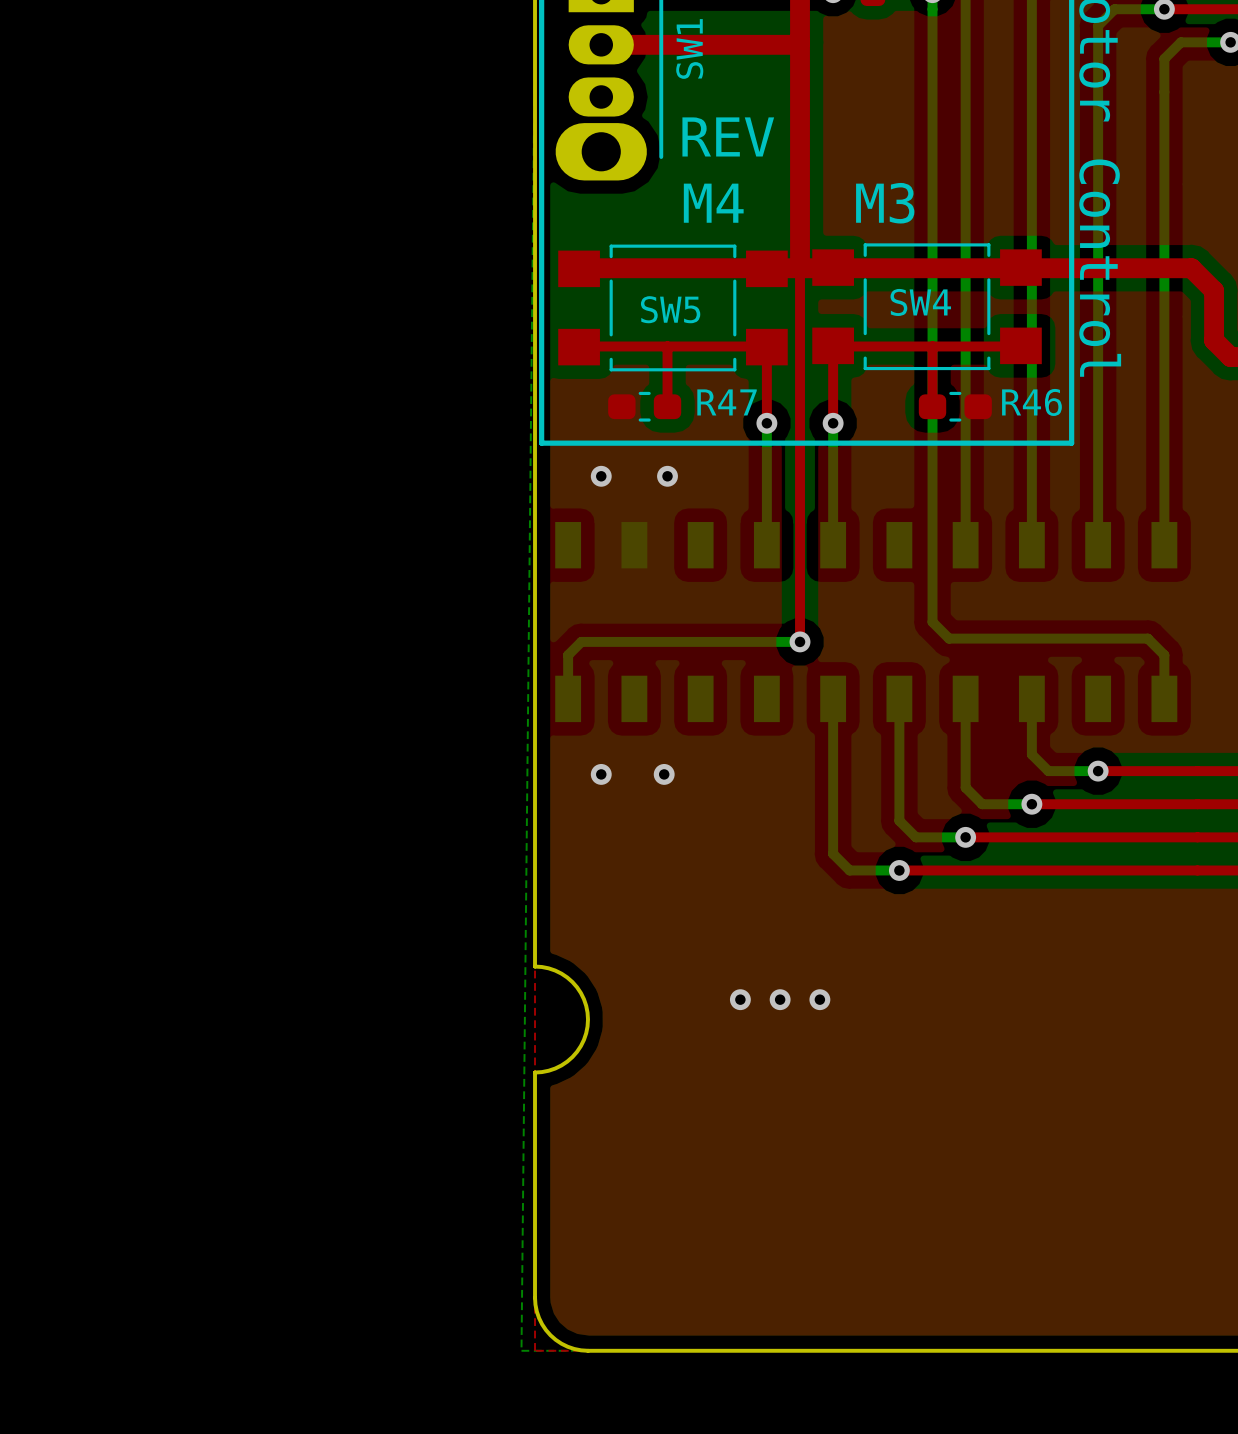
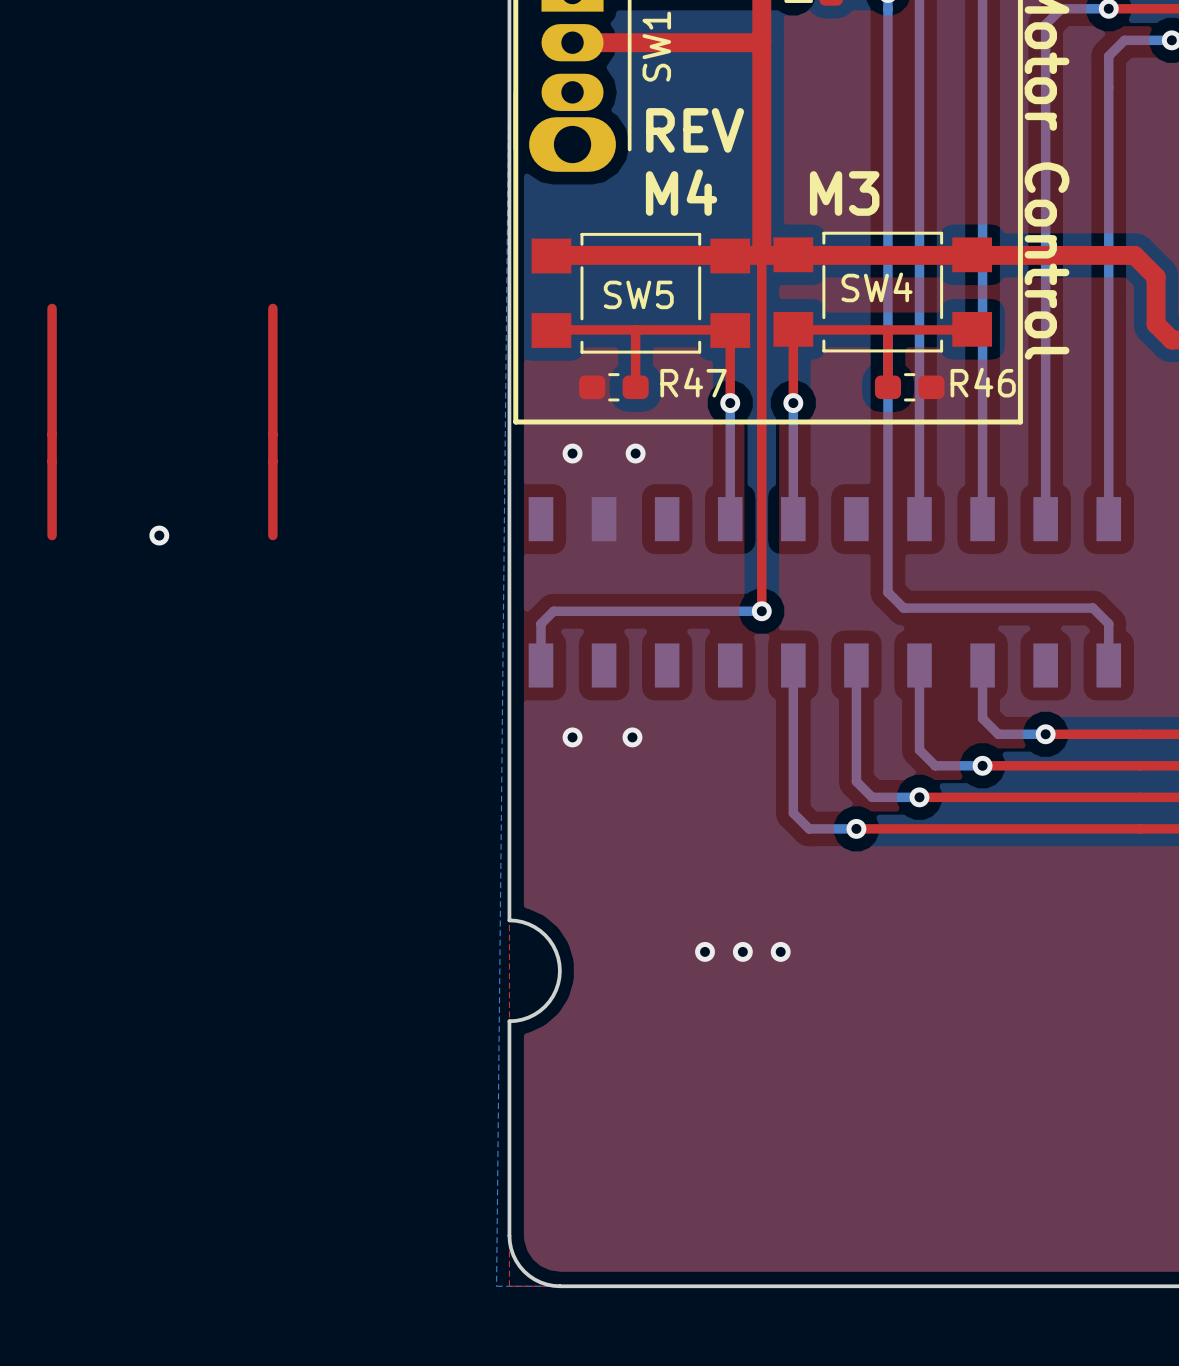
top track: none -> (52, 308) (52, 535)
top track: none -> (272, 308) (272, 535)
via: none -> (159, 535)

